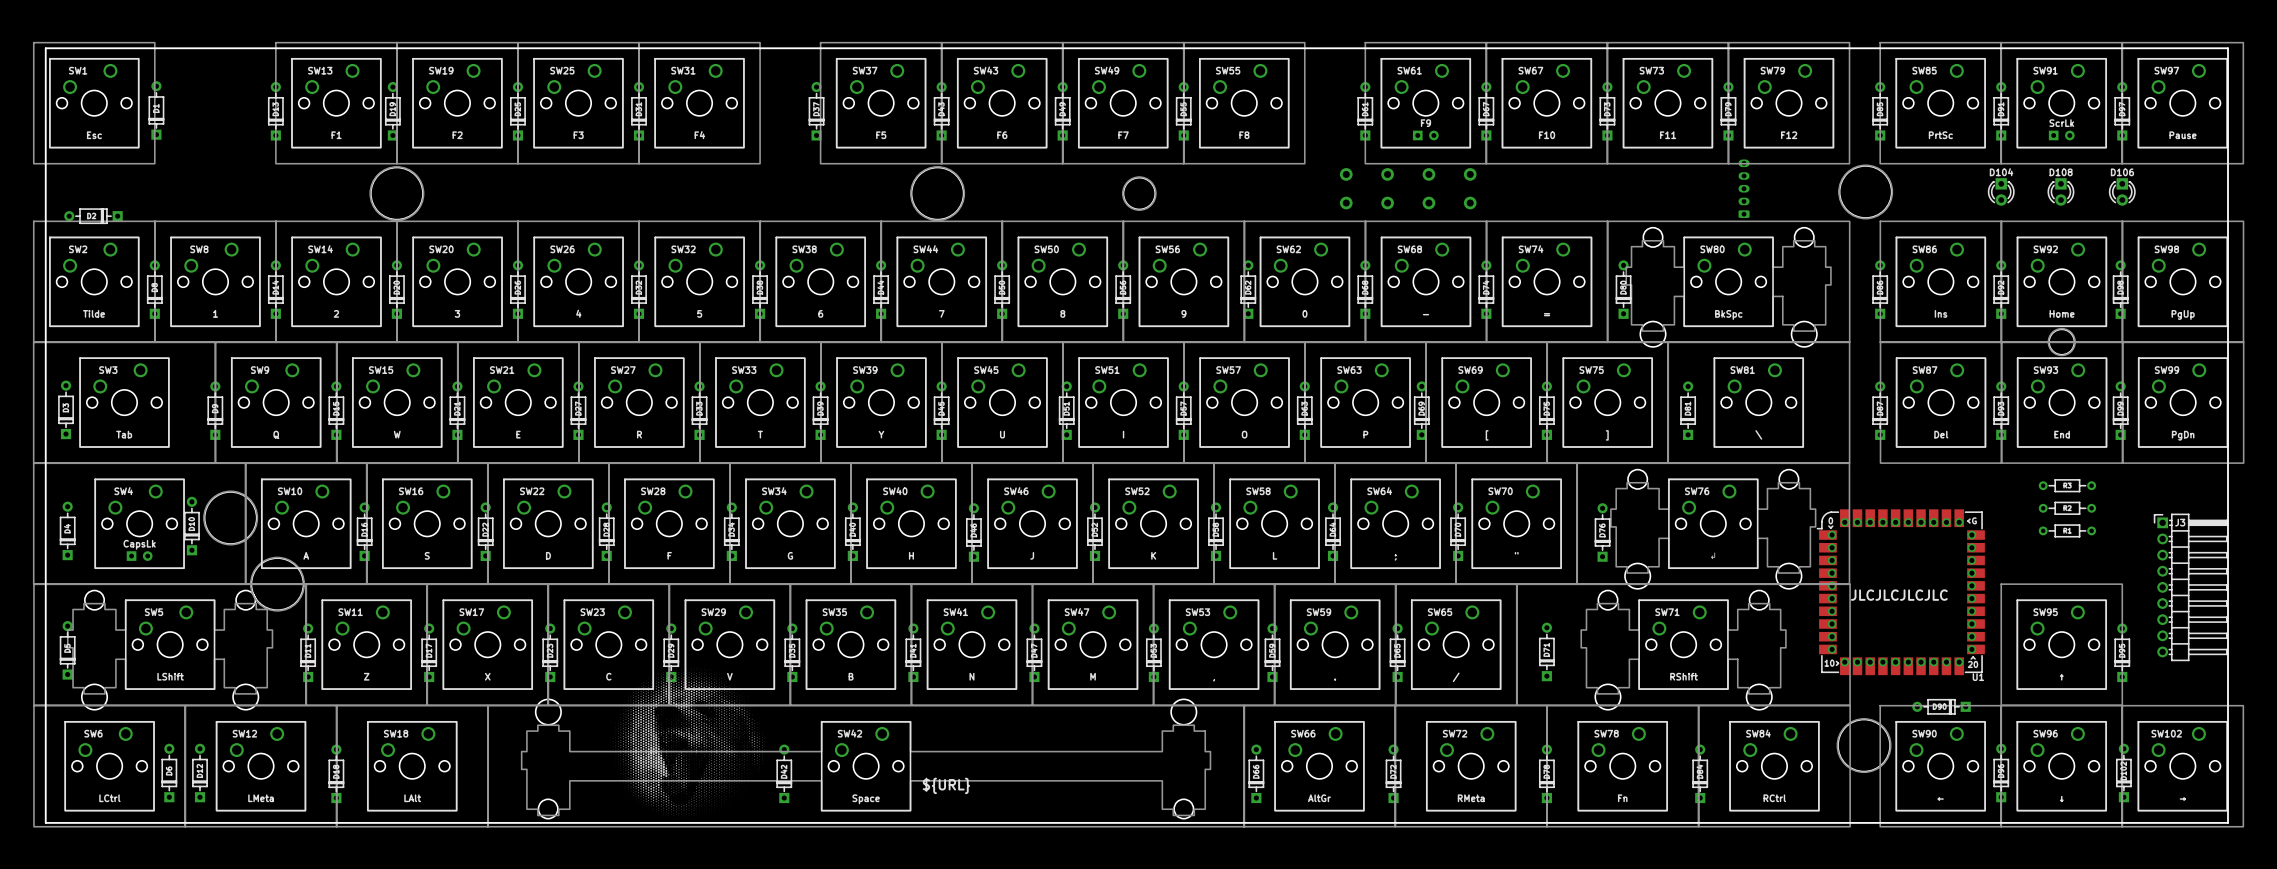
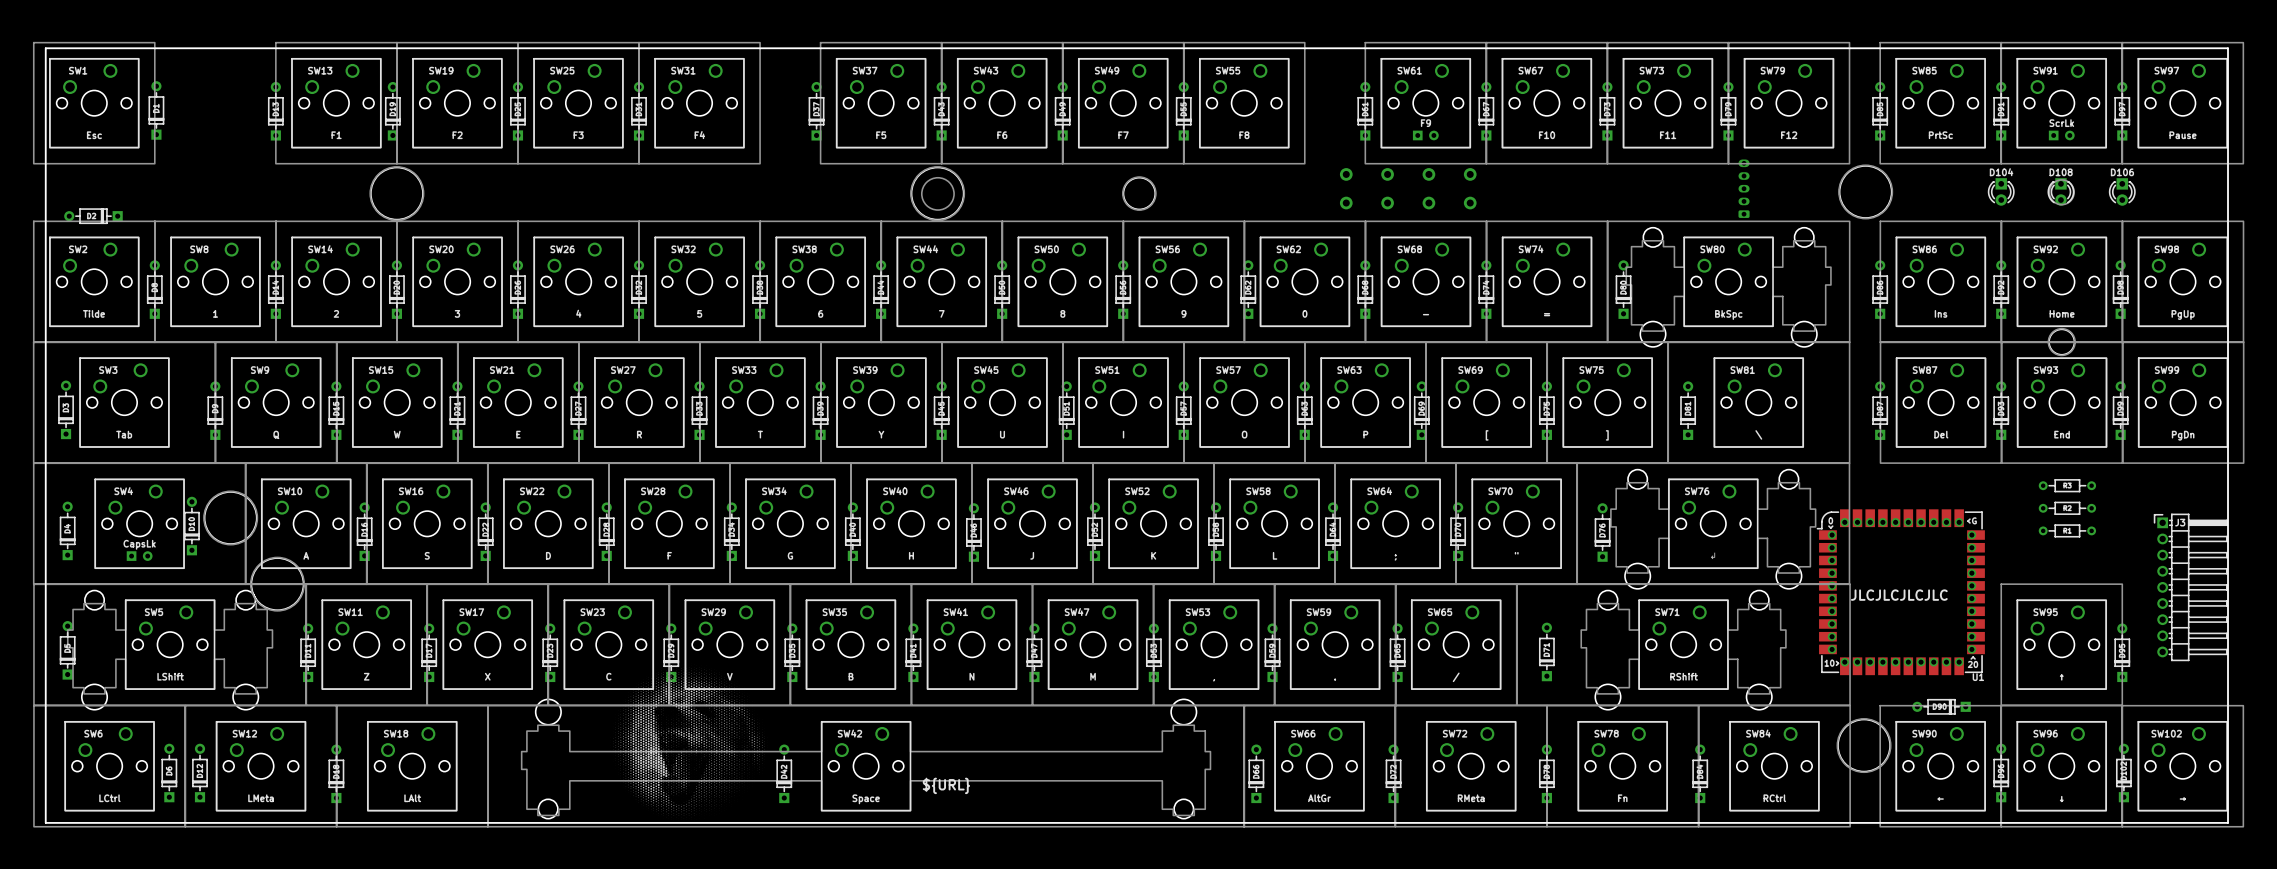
drawing: none -> [921, 177, 955, 211]
drawing: none -> [2048, 179, 2075, 206]

